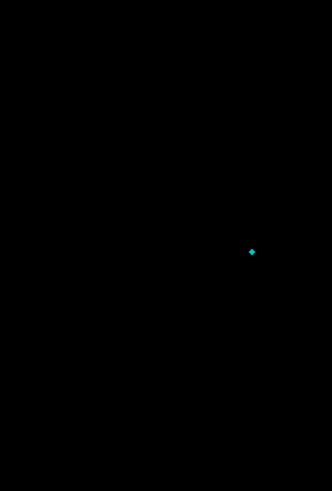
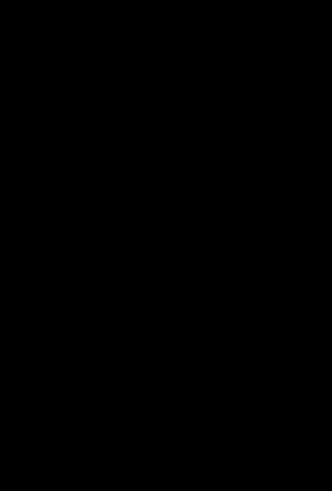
drawing: [248, 248, 256, 256] -> none

